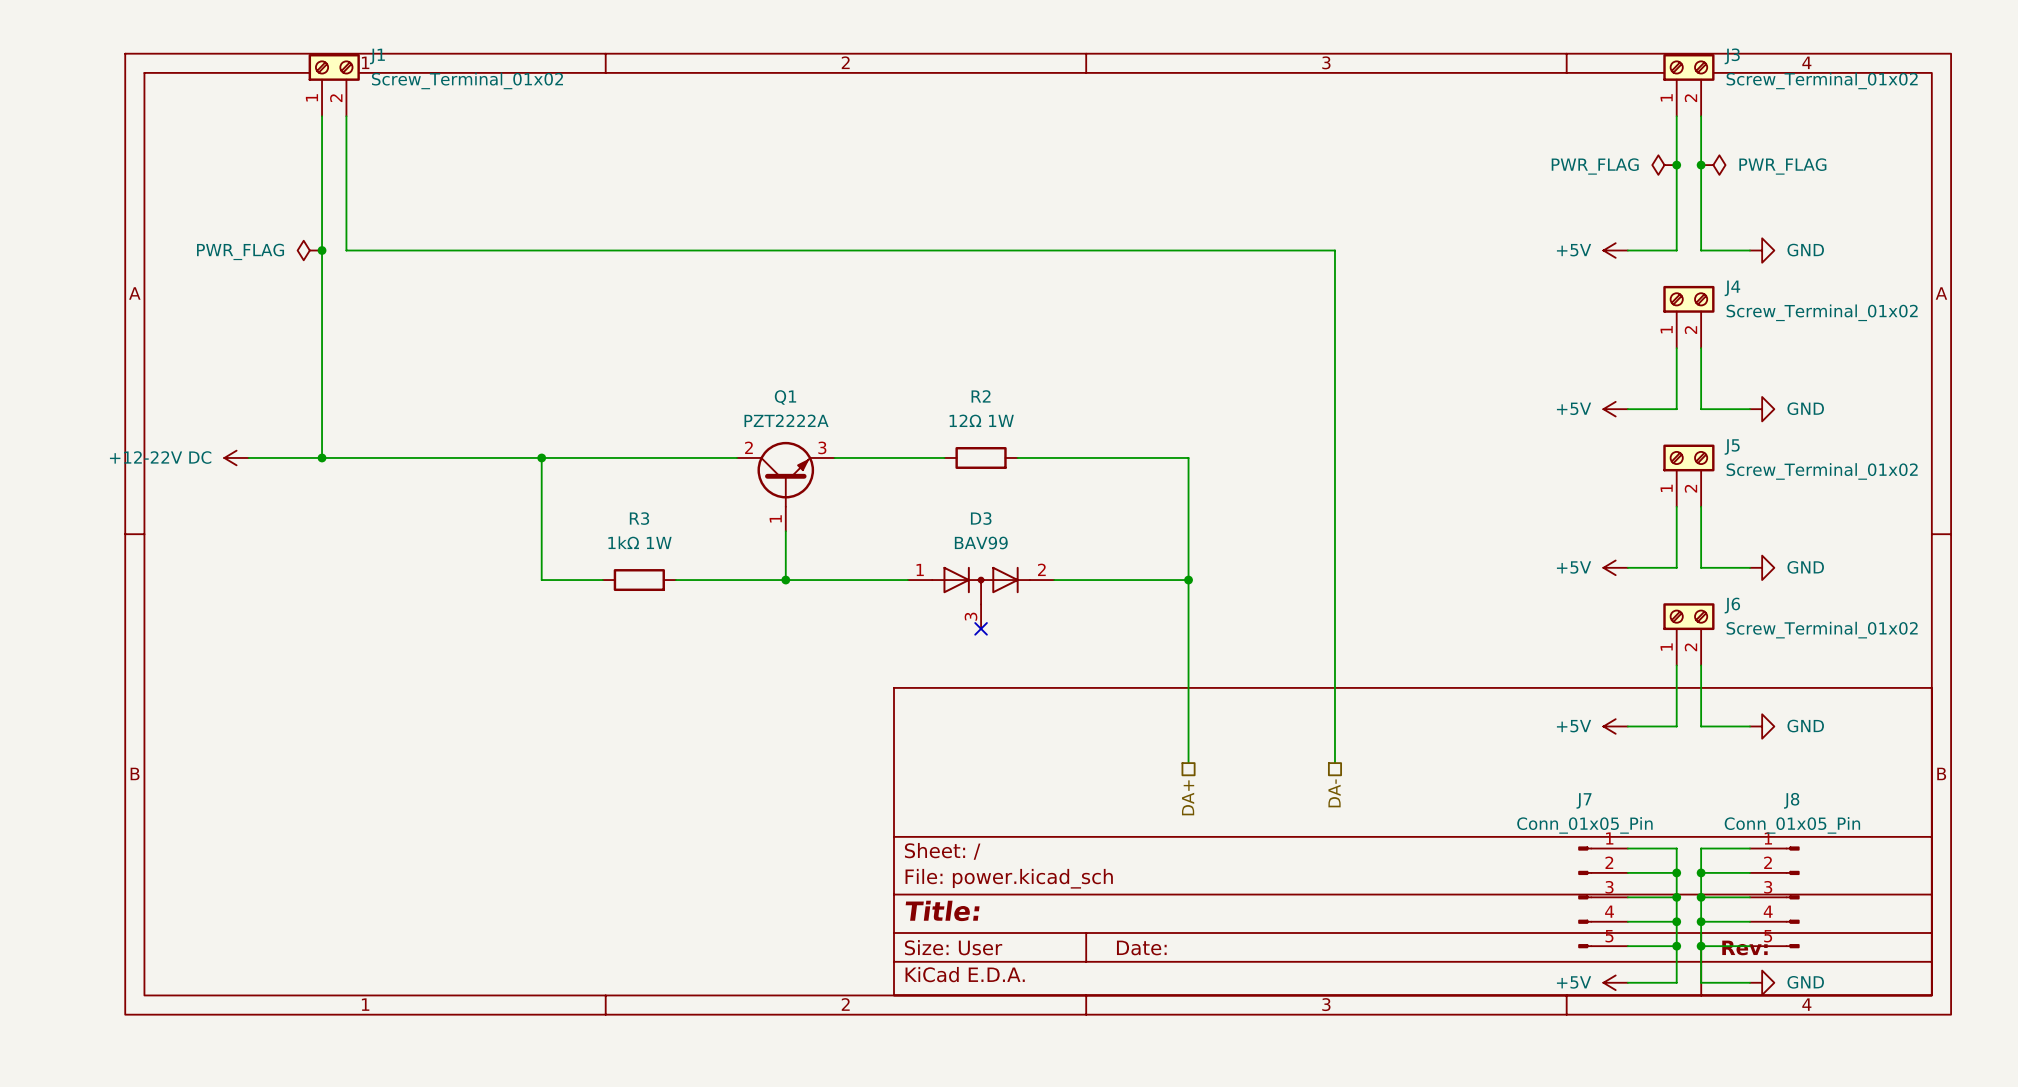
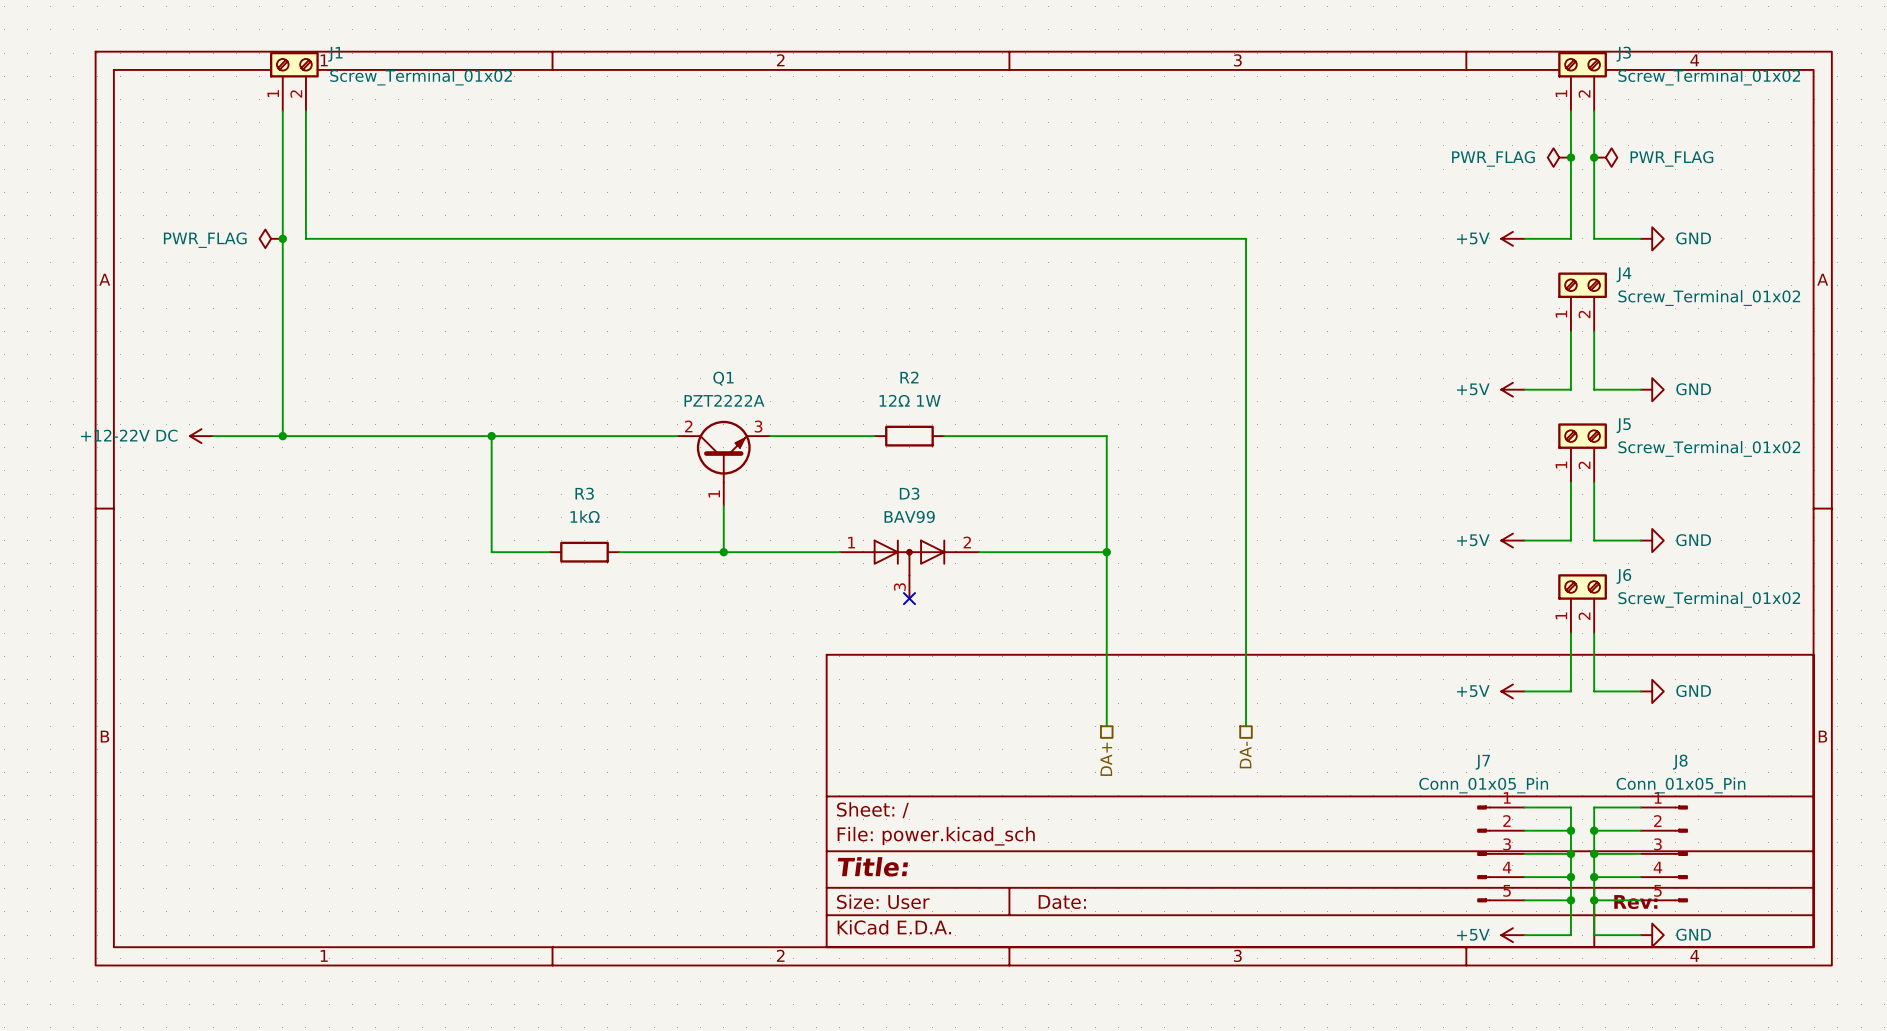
R3 value: 1kΩ 1W (639, 542) -> 1kΩ (585, 516)

